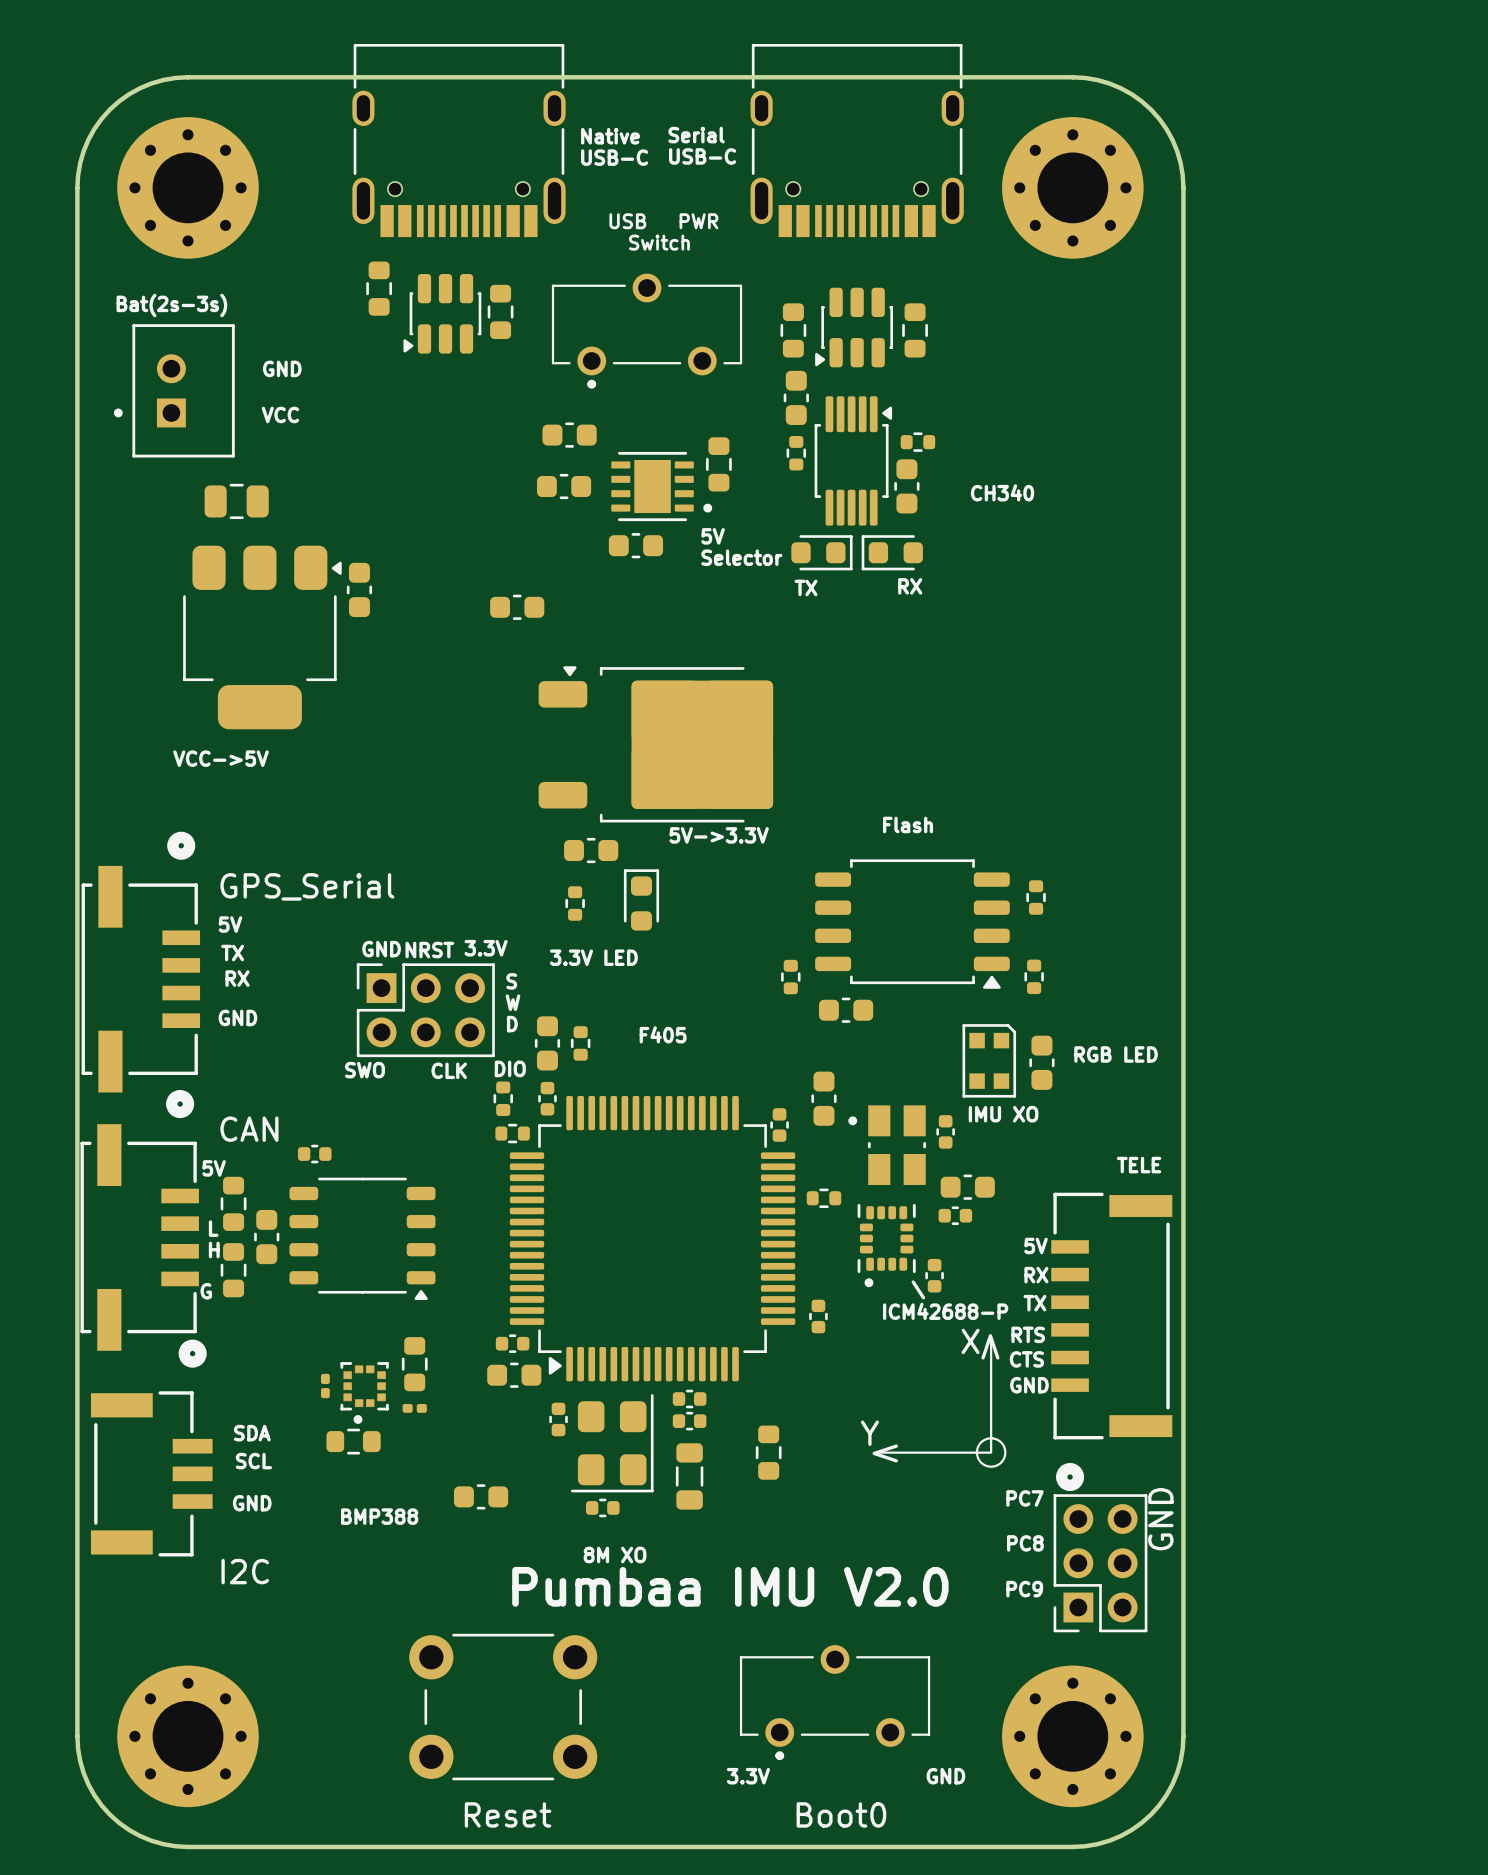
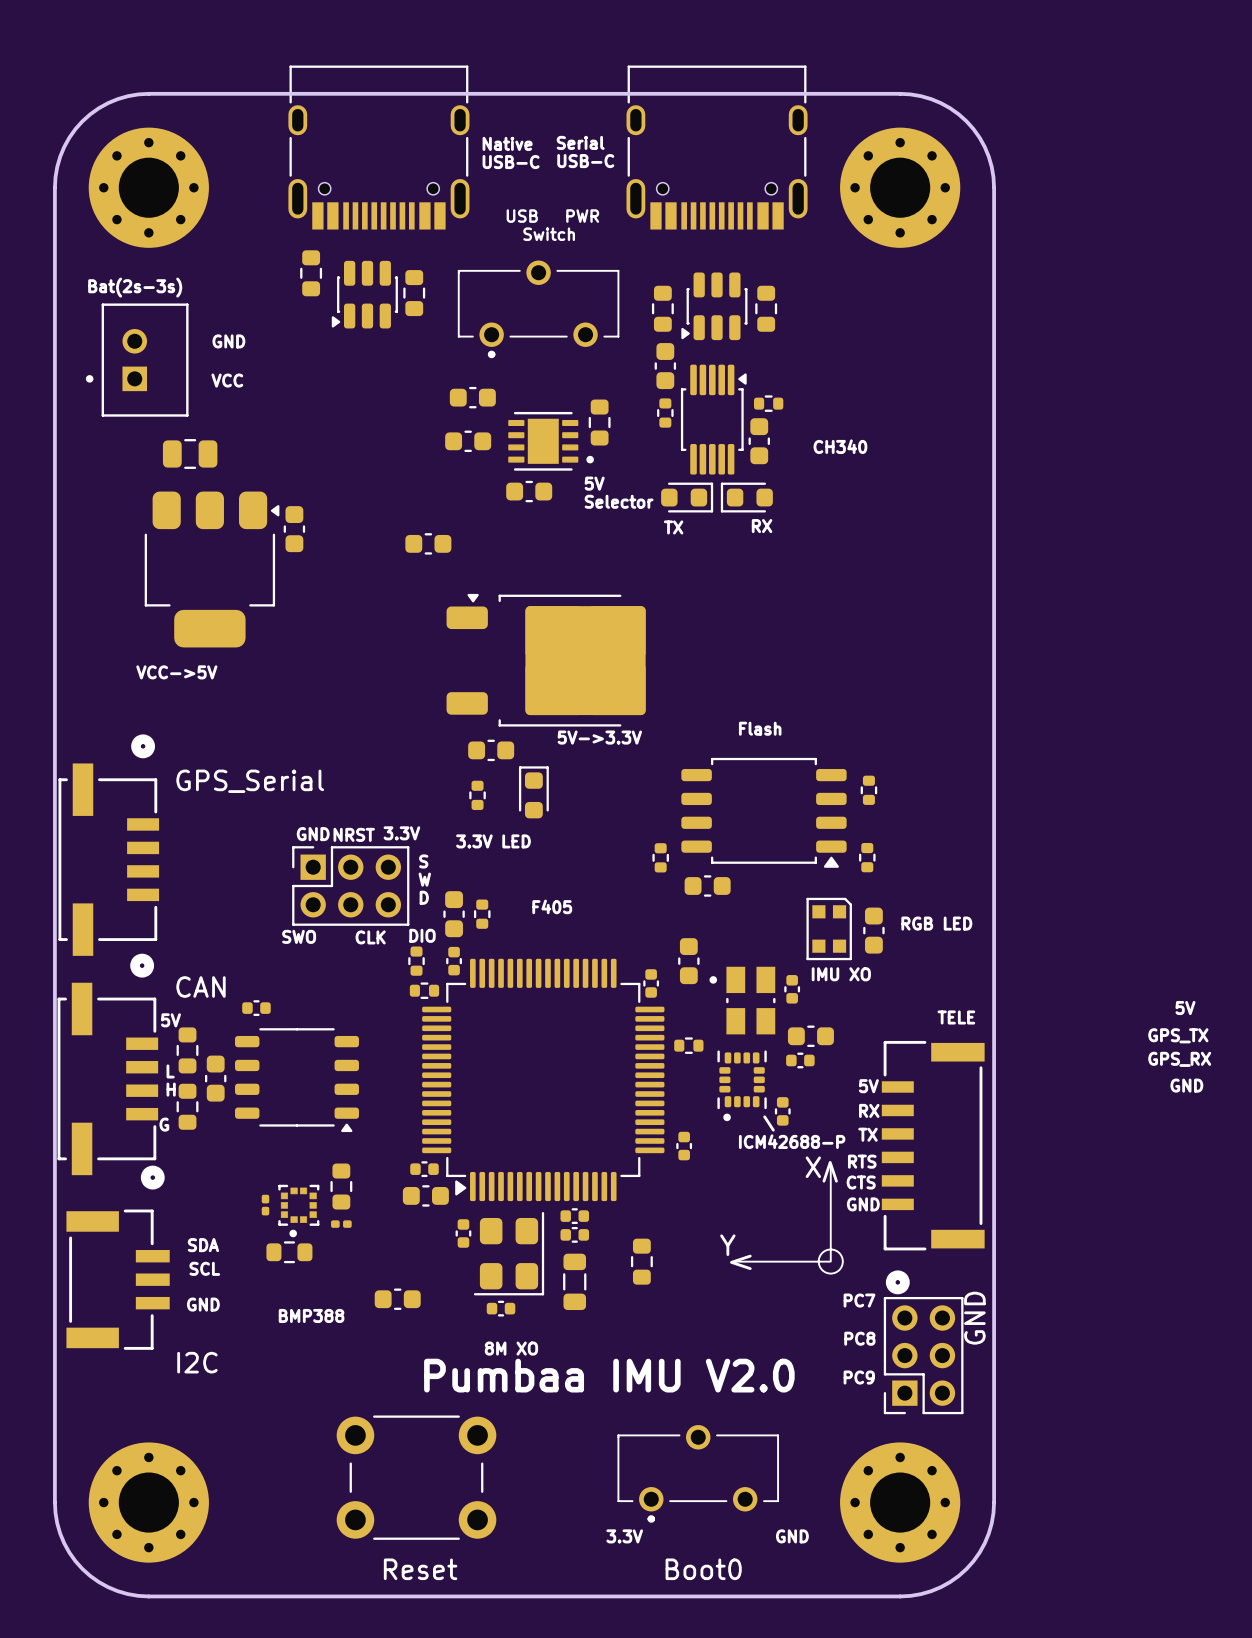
text: 5V (230, 924) -> none
text: TX (232, 953) -> none
text: RX (237, 978) -> none
text: GND (237, 1017) -> none
text: none -> 5V (1185, 1008)
text: none -> GPS_TX (1178, 1035)
text: none -> GPS_RX (1179, 1059)
text: none -> GND (1186, 1085)

